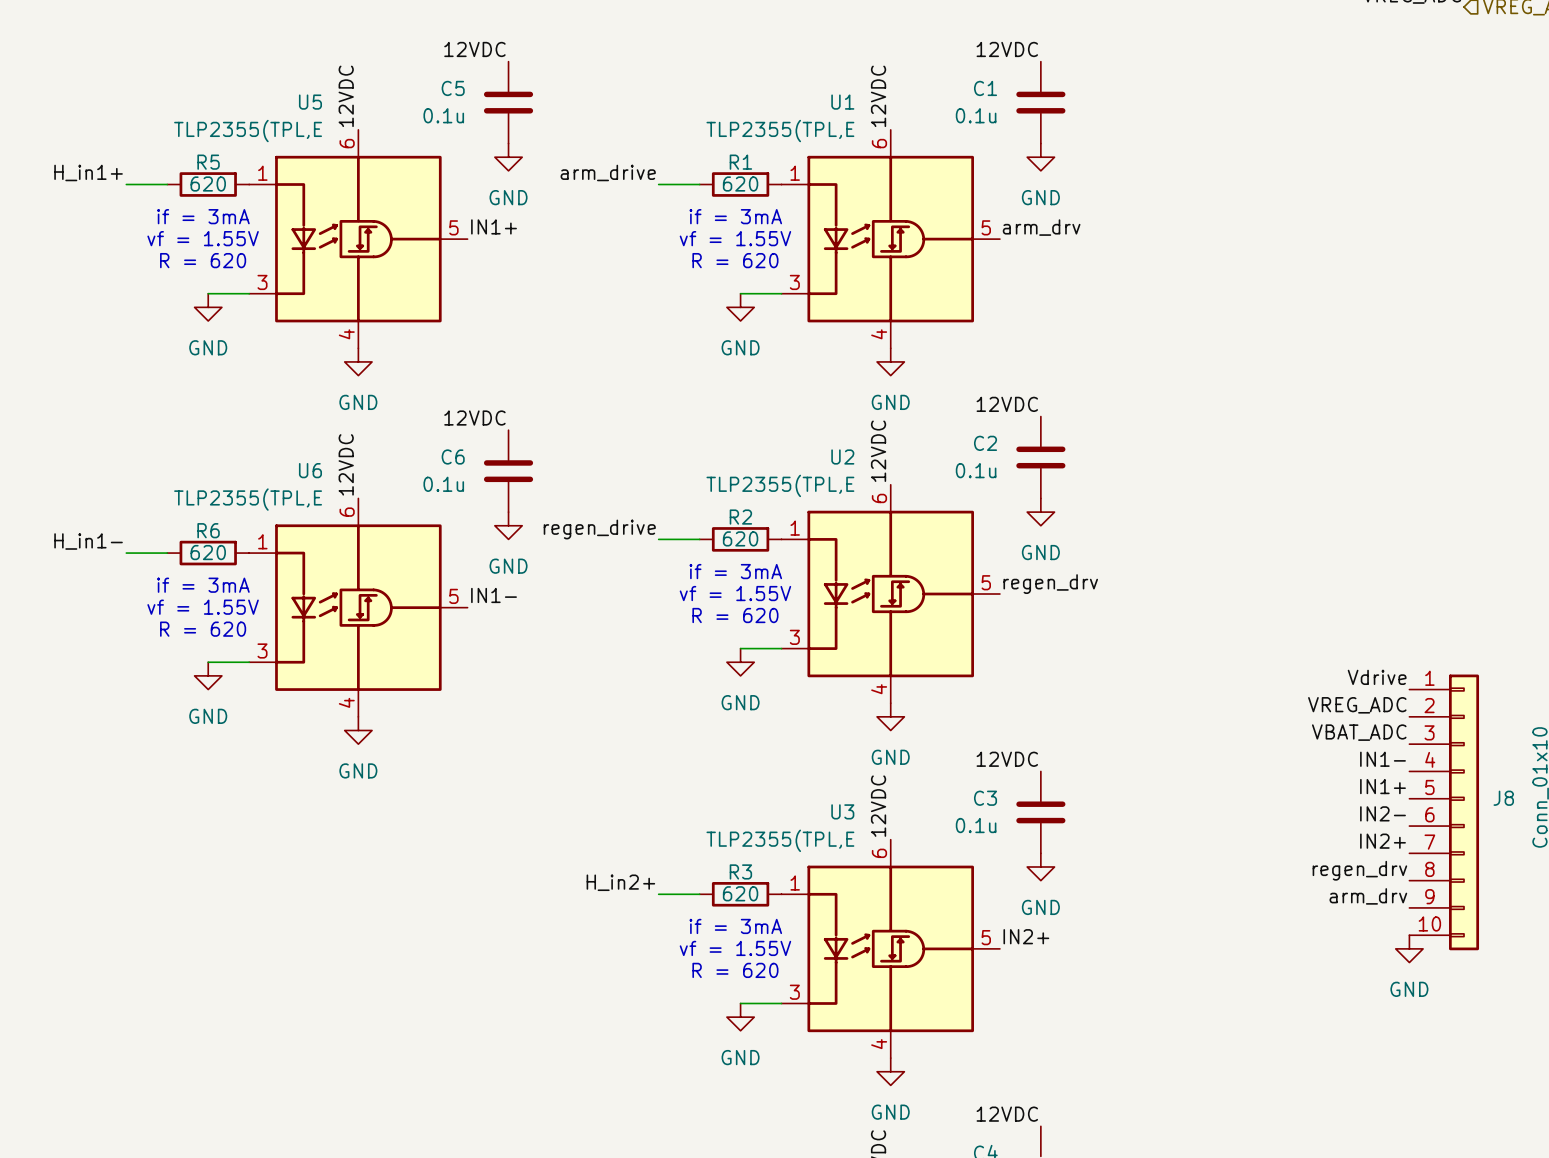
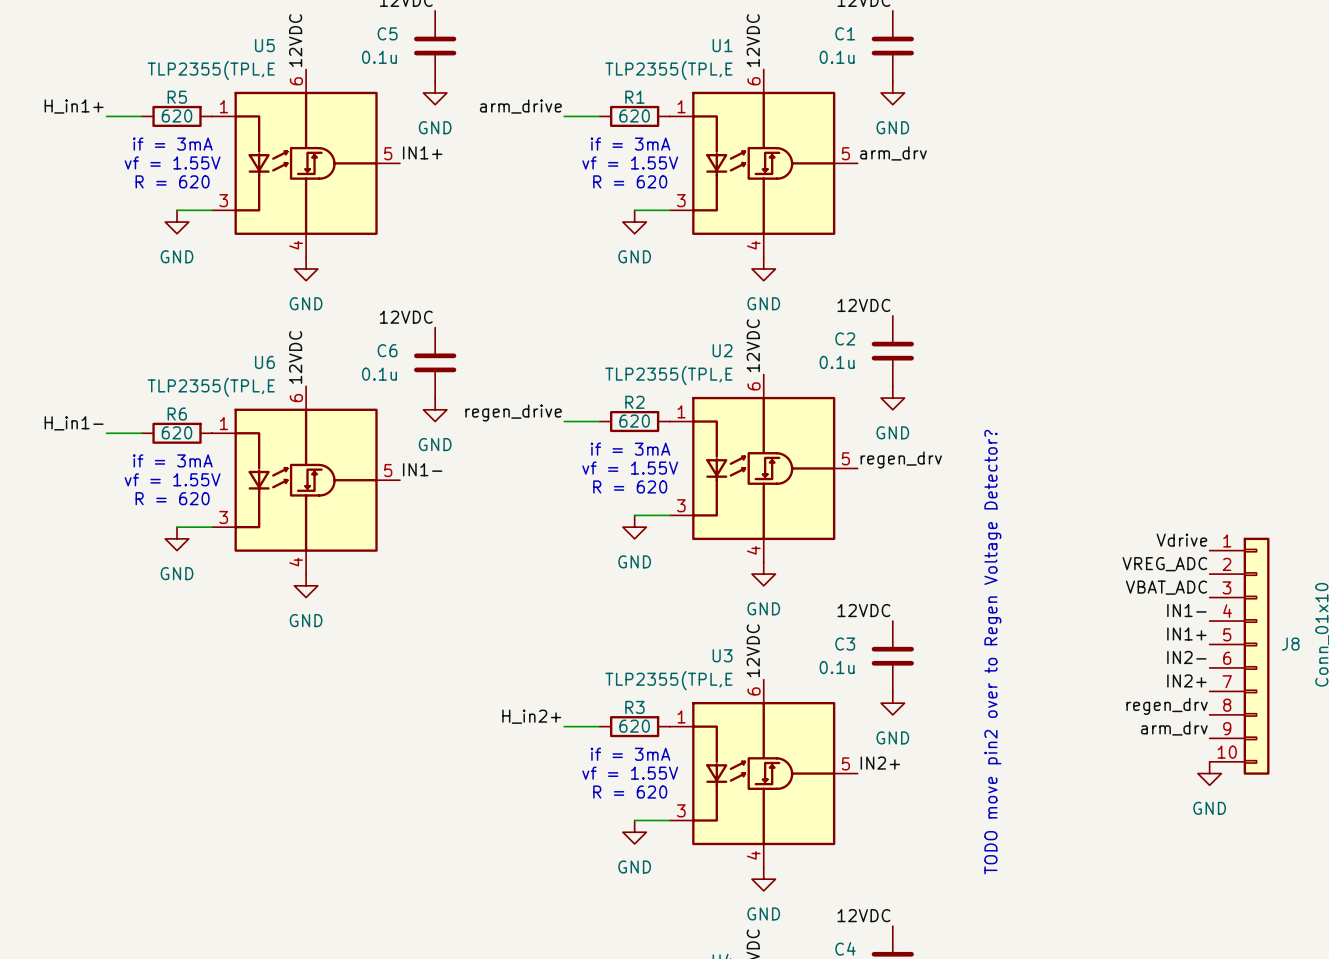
text: none -> TODO move pin2 over to Regen Voltage Detector? (992, 652)

